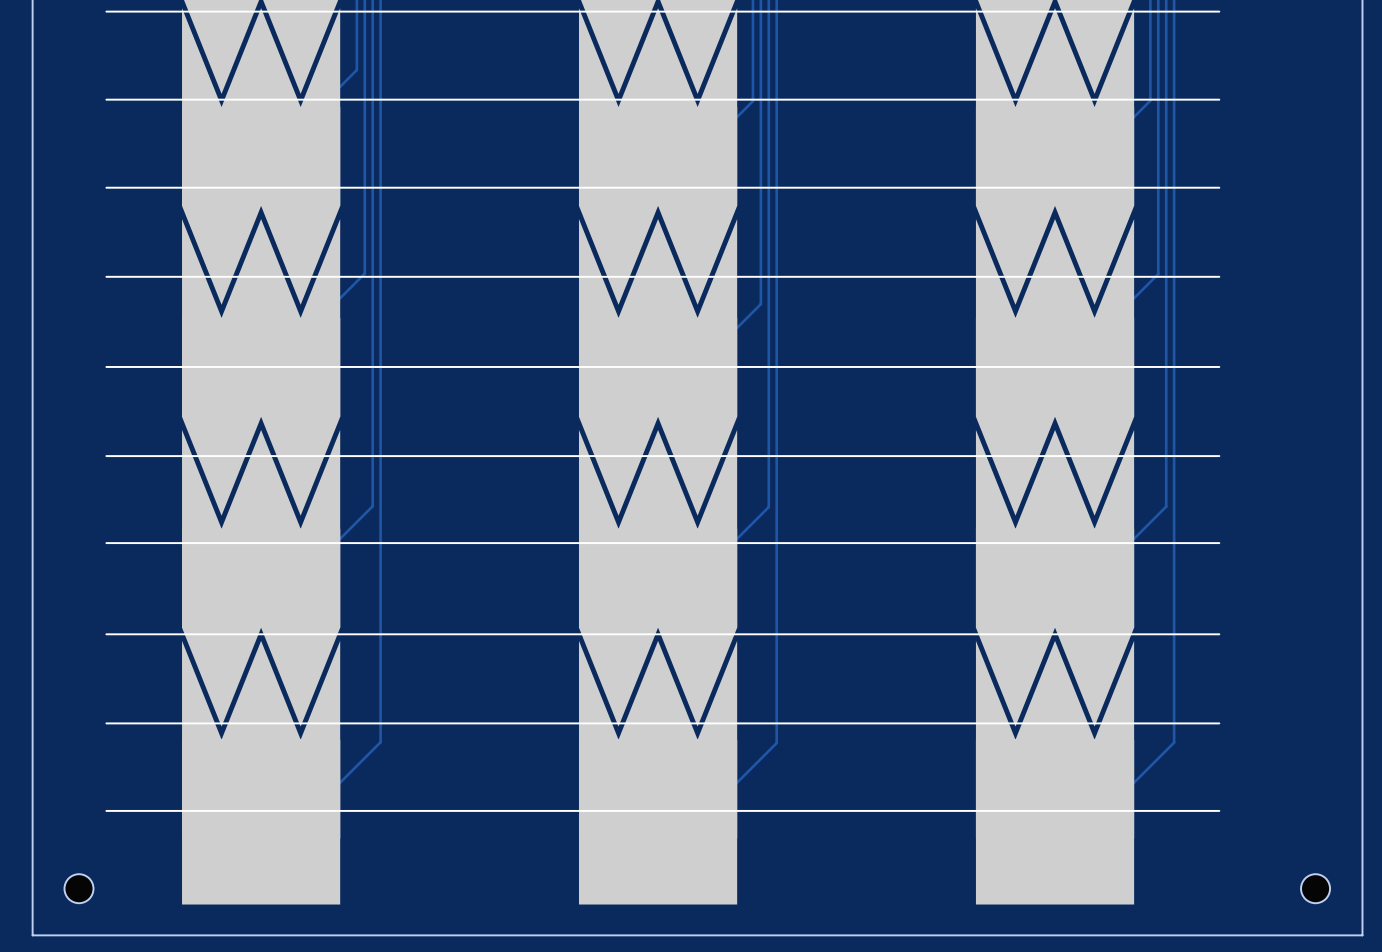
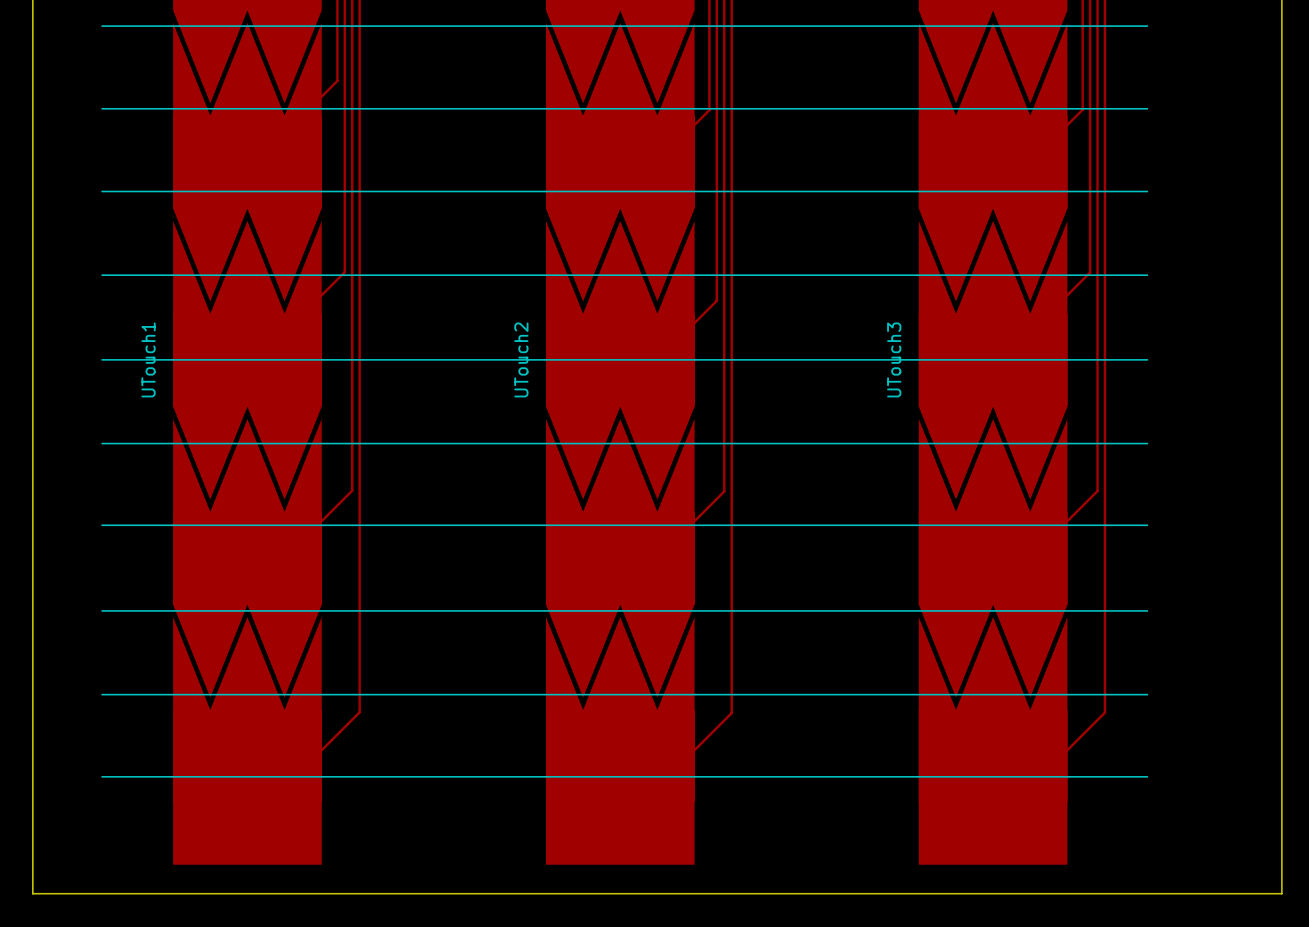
UTouch1 name: none -> UTouch1 (148, 359)
UTouch2 name: none -> UTouch2 (521, 359)
UTouch3 name: none -> UTouch3 (894, 359)
part: (78, 888) -> none
part: (1315, 888) -> none

